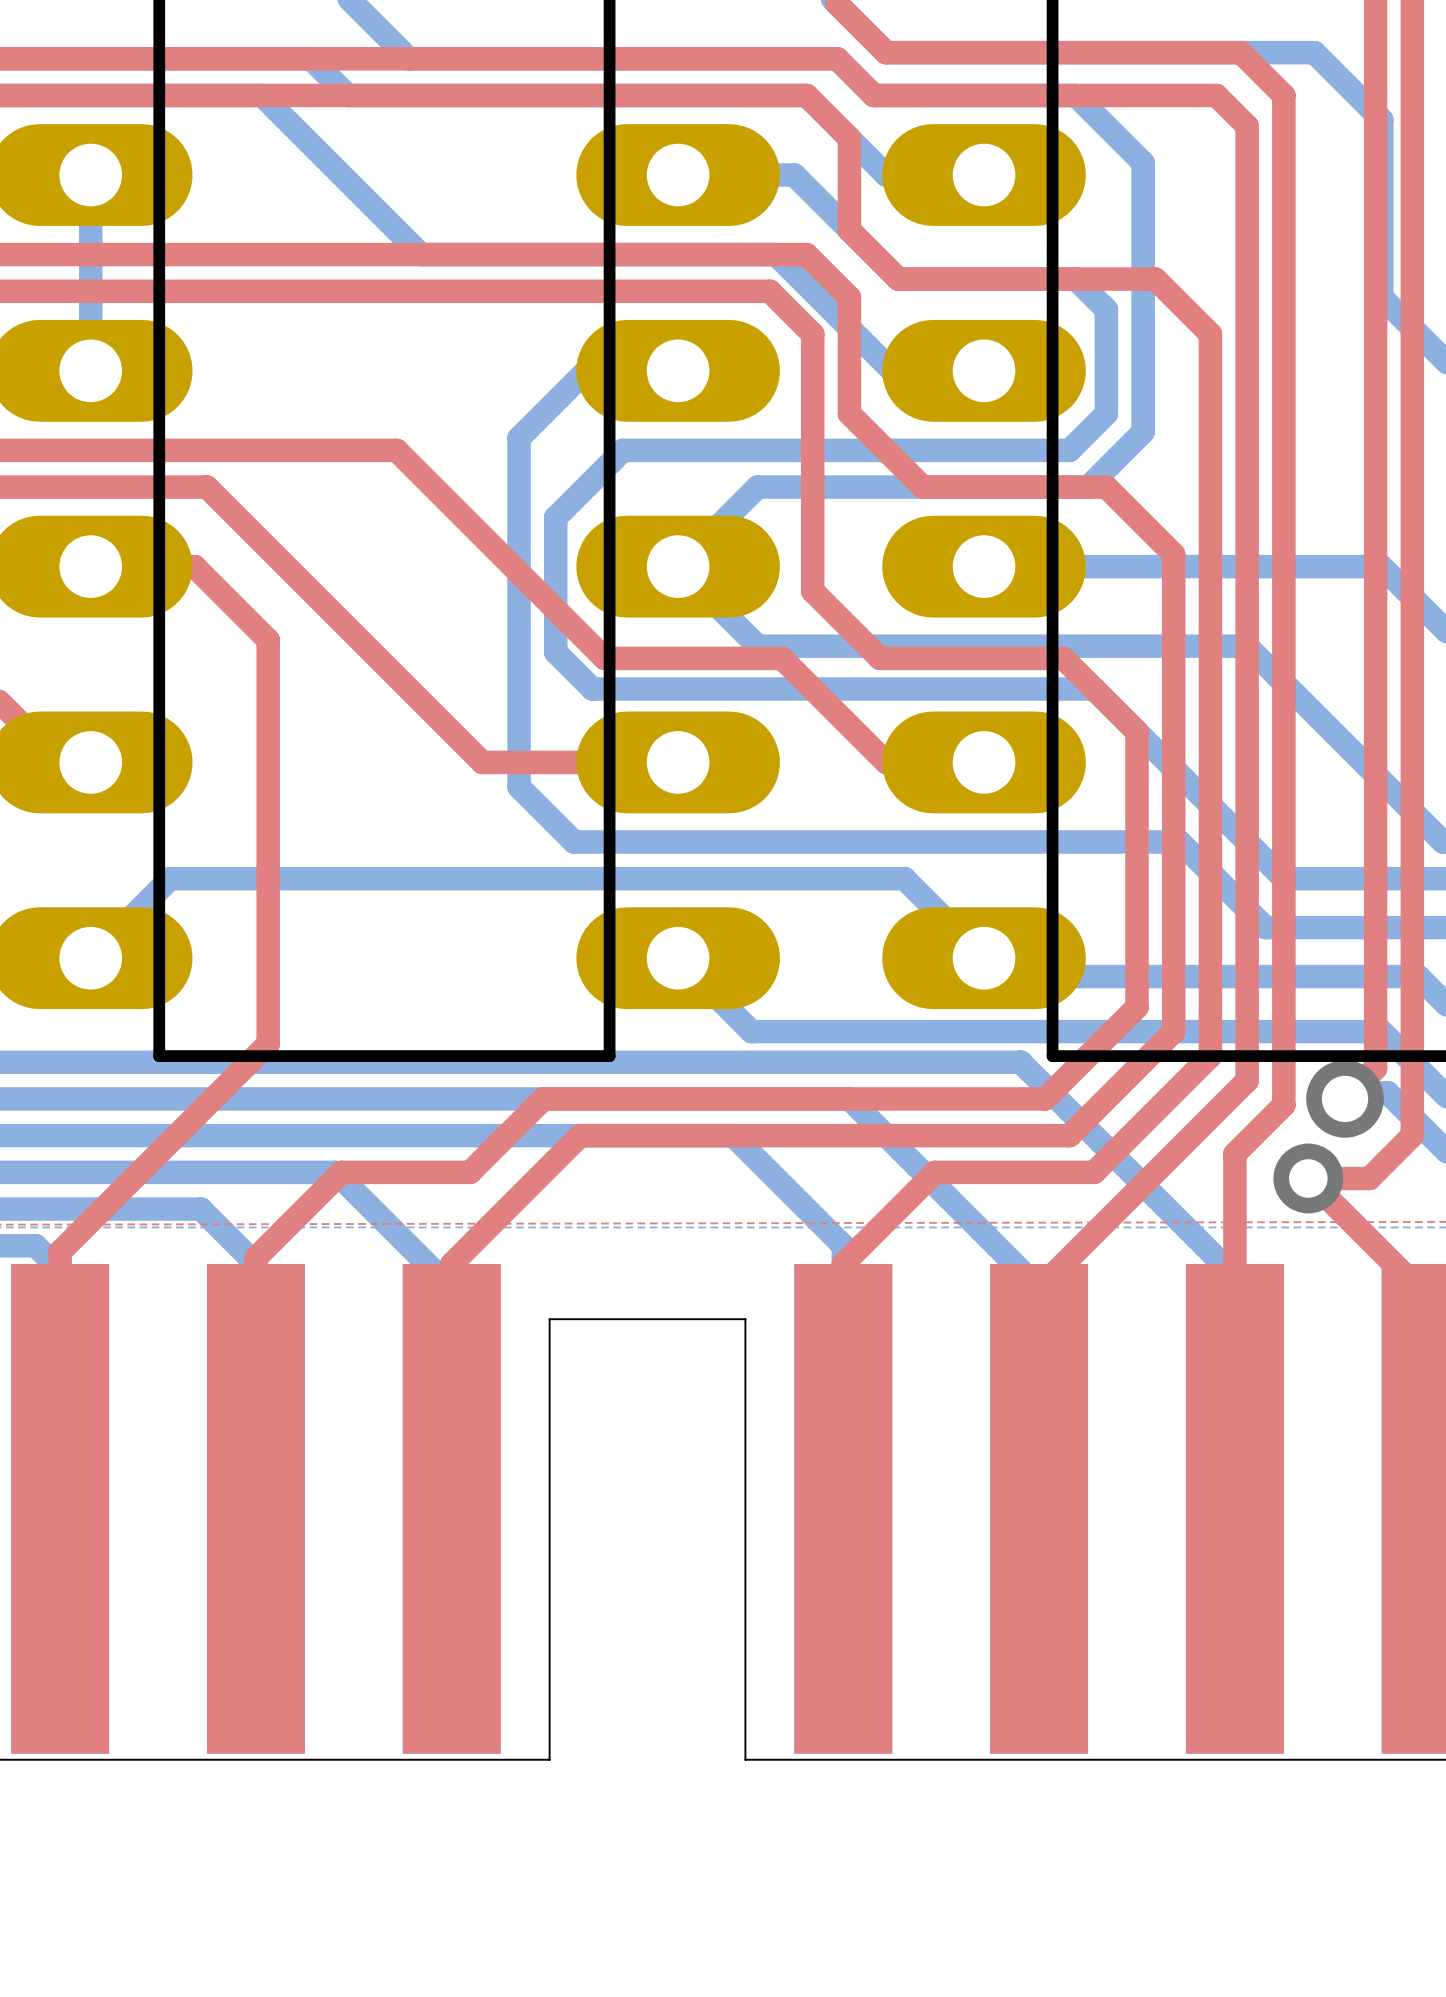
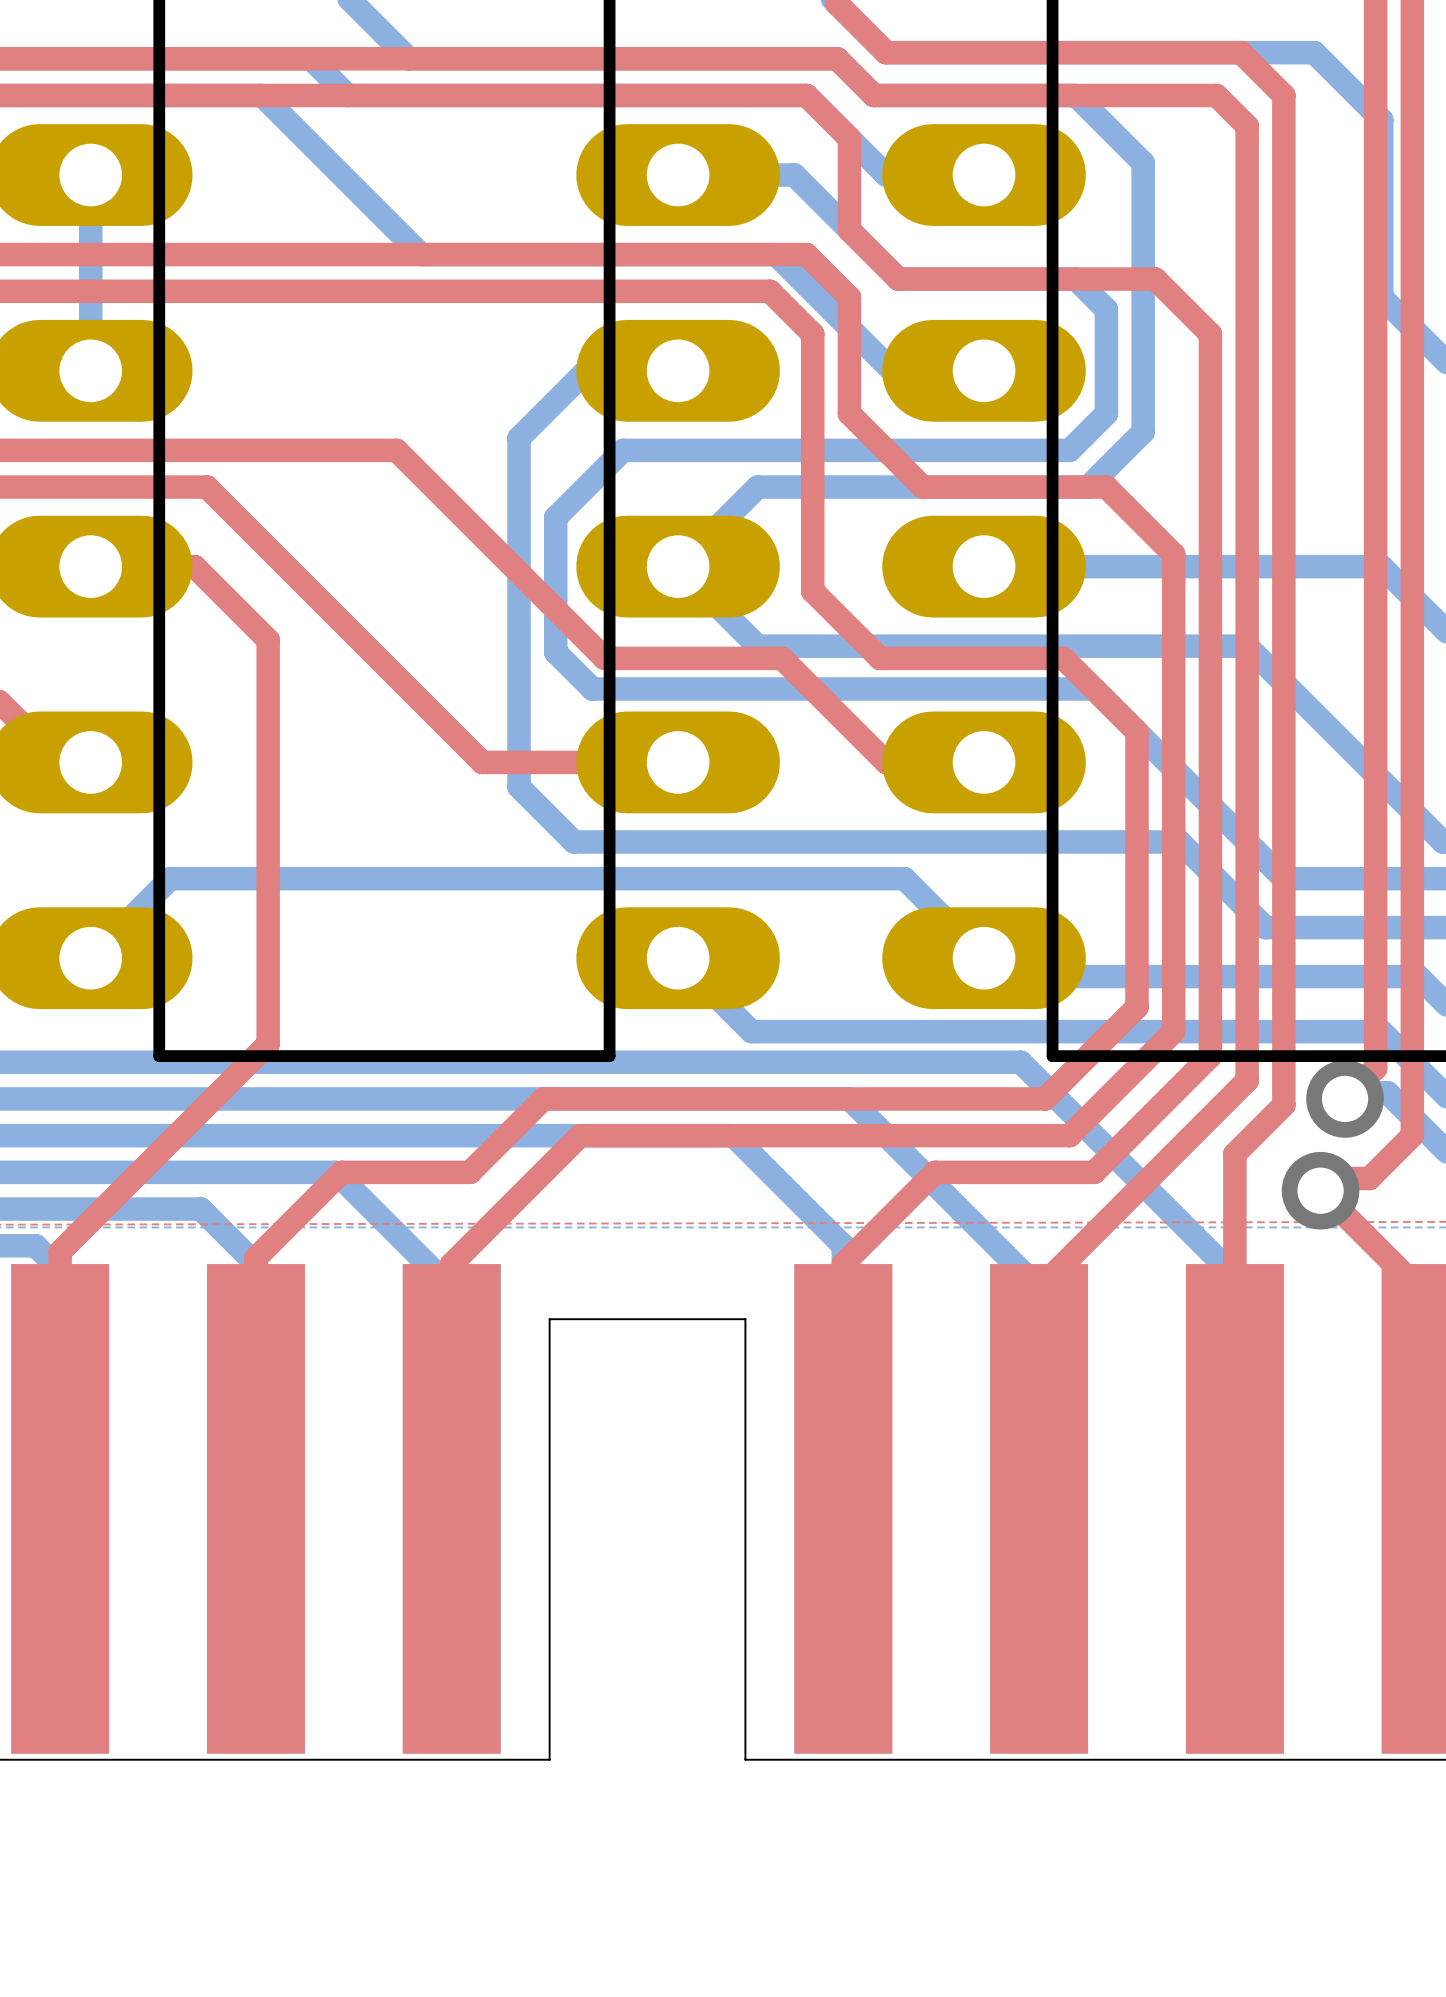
via position: (1308, 1178) -> (1320, 1190)

